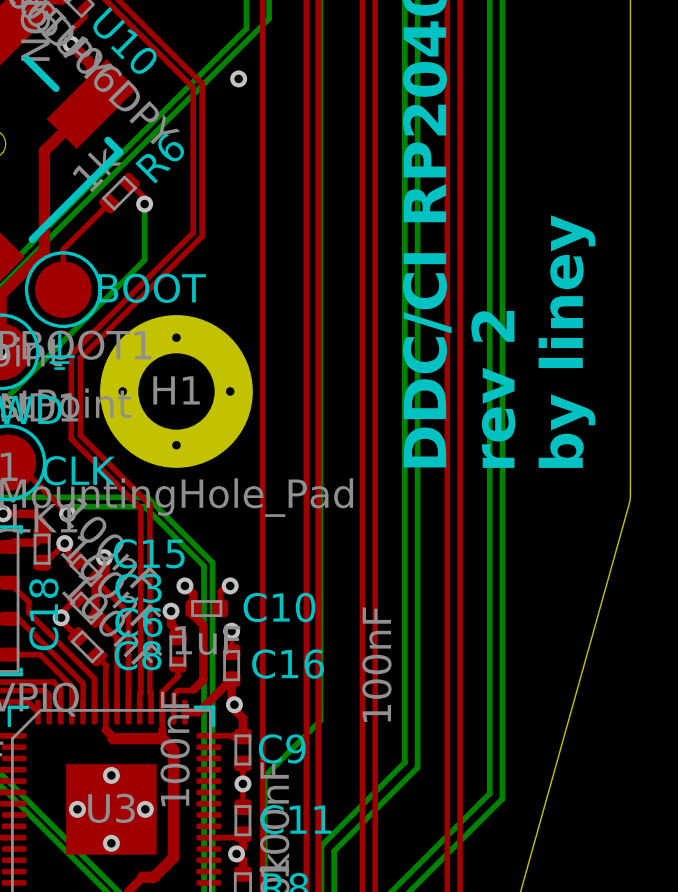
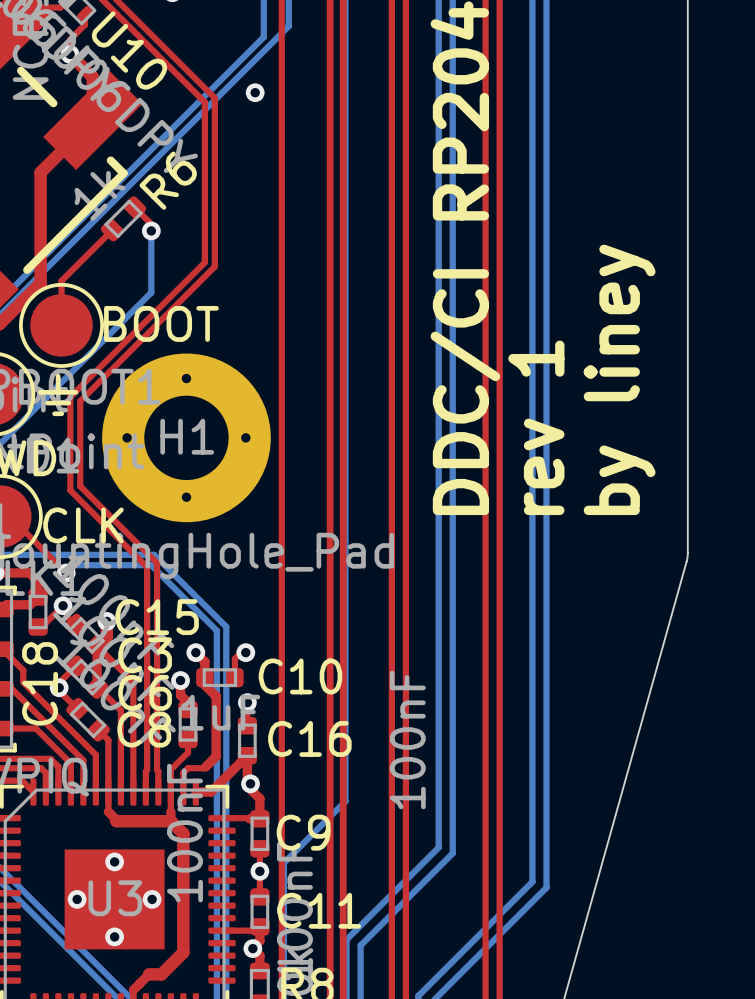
text: rev 2 (493, 389) -> rev 1 (536, 427)

